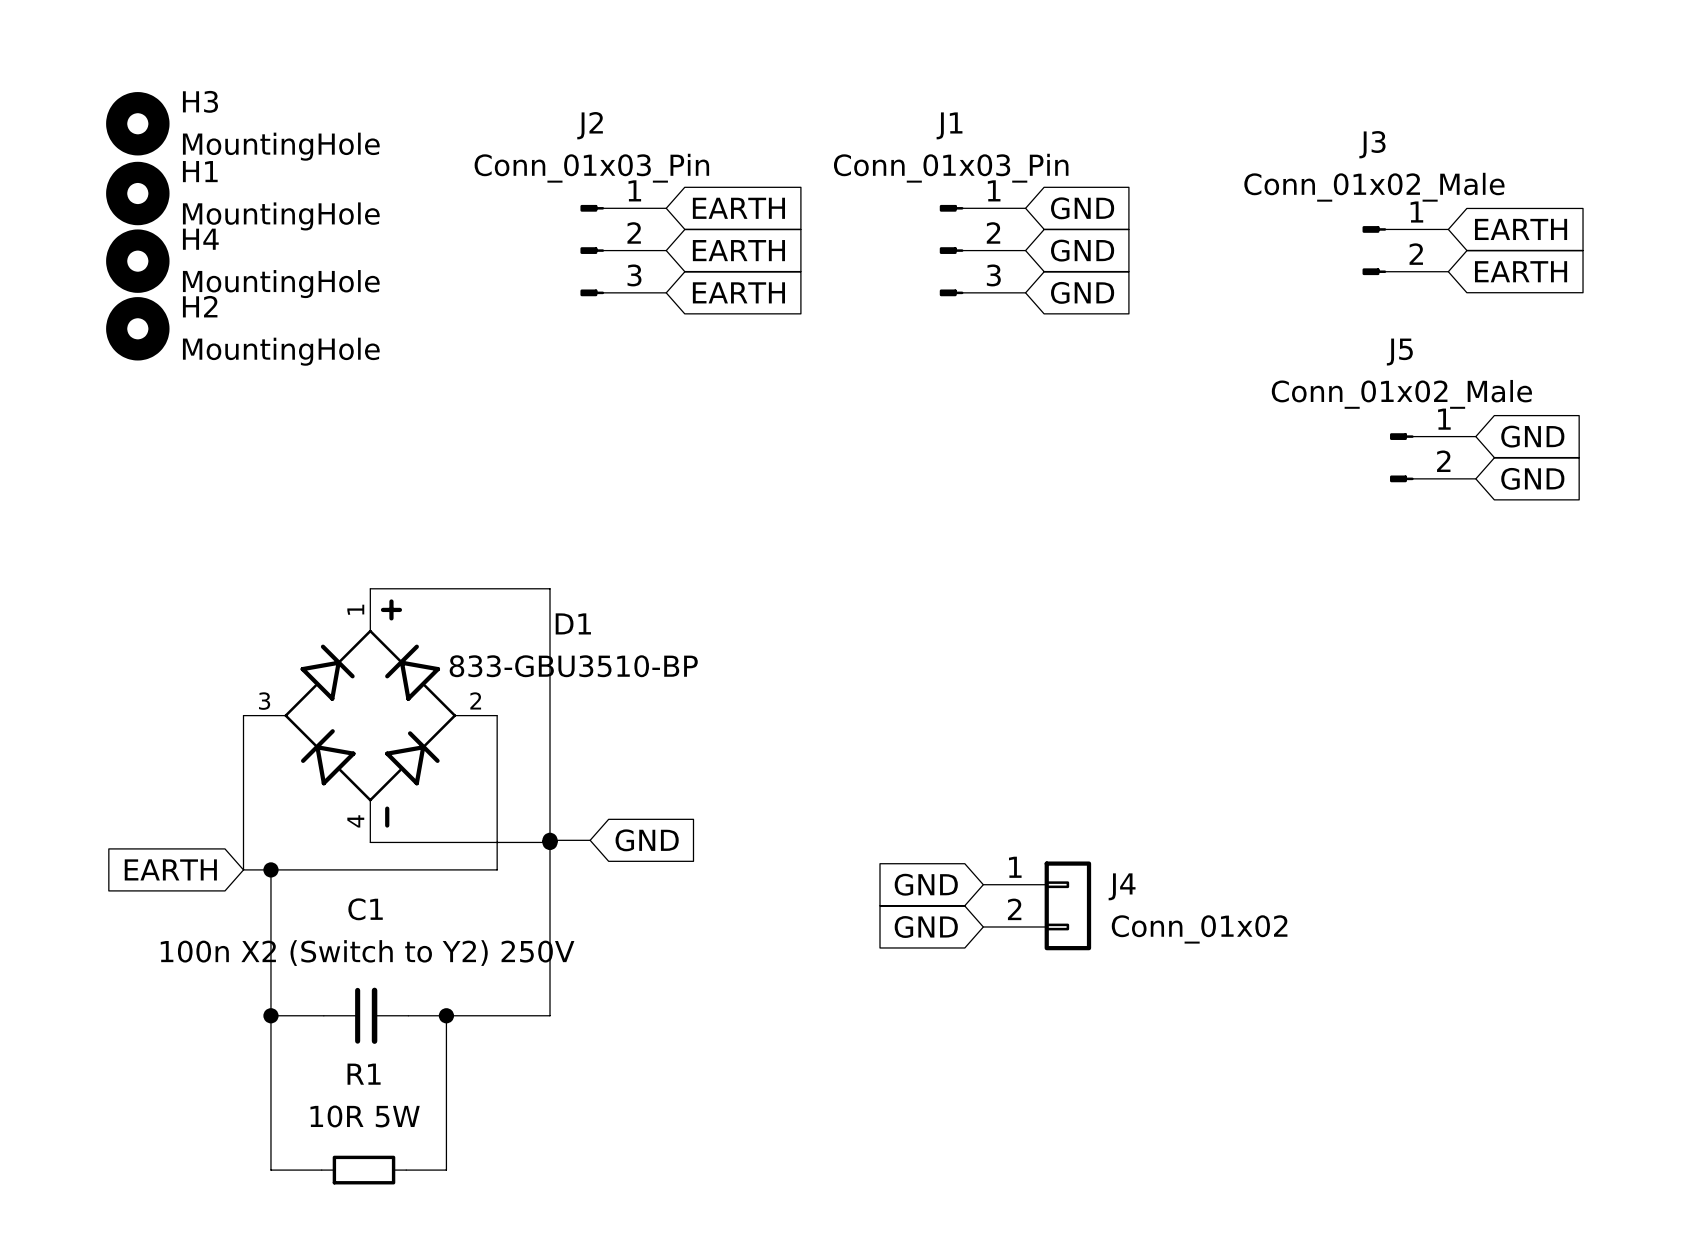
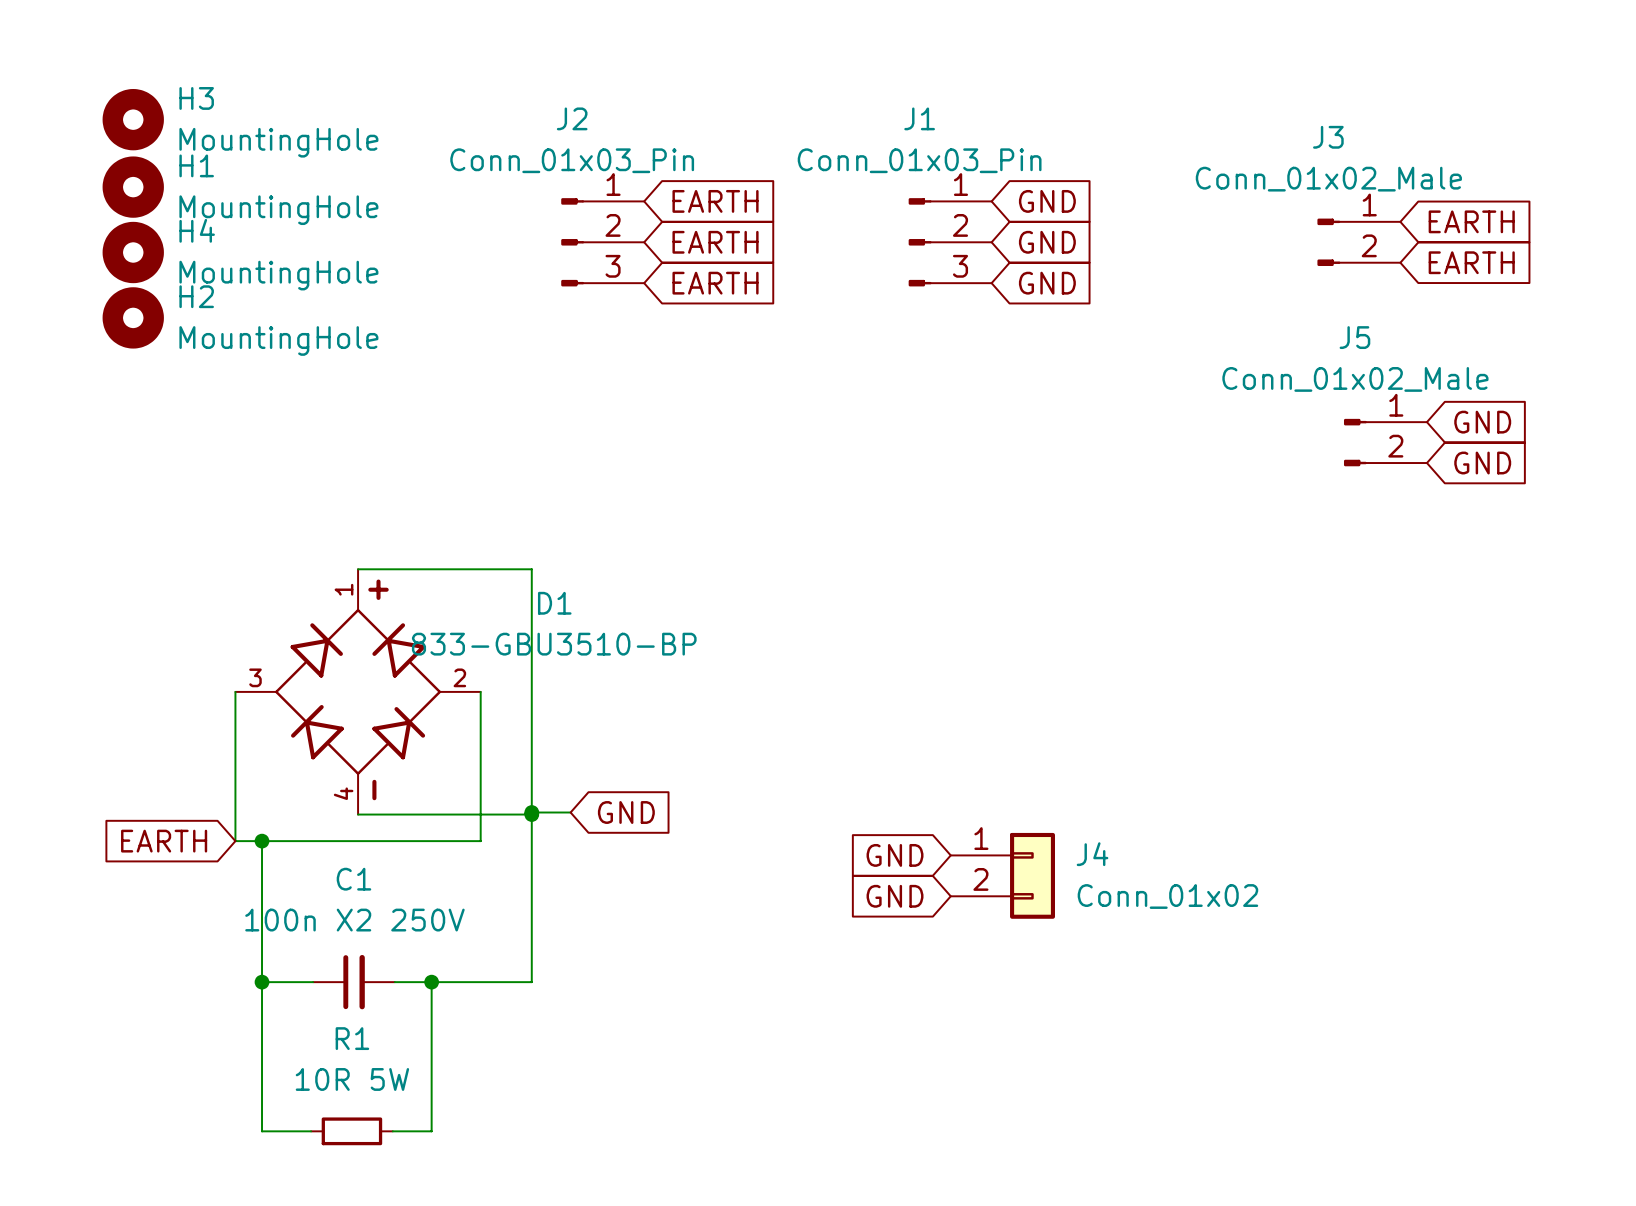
C1 value: 100n X2 (Switch to Y2) 250V (367, 953) -> 100n X2 250V (354, 920)

